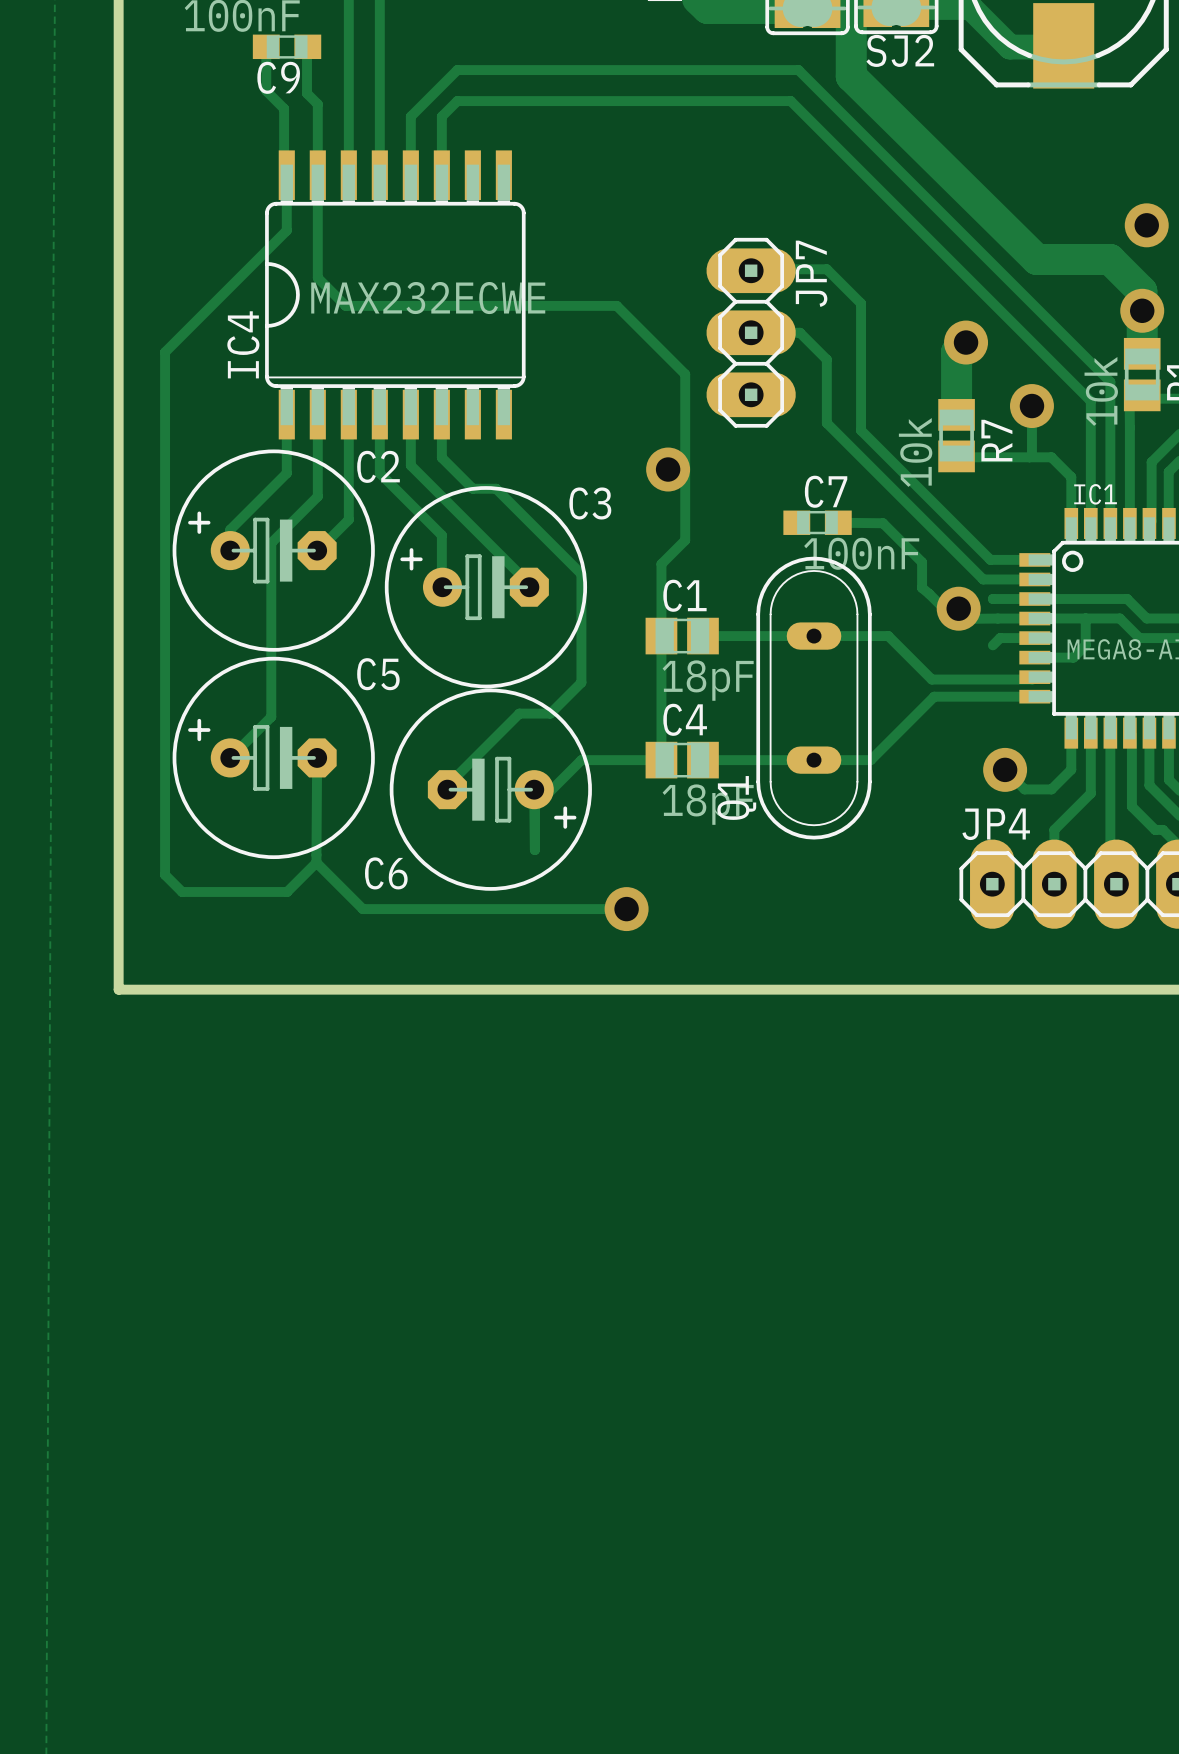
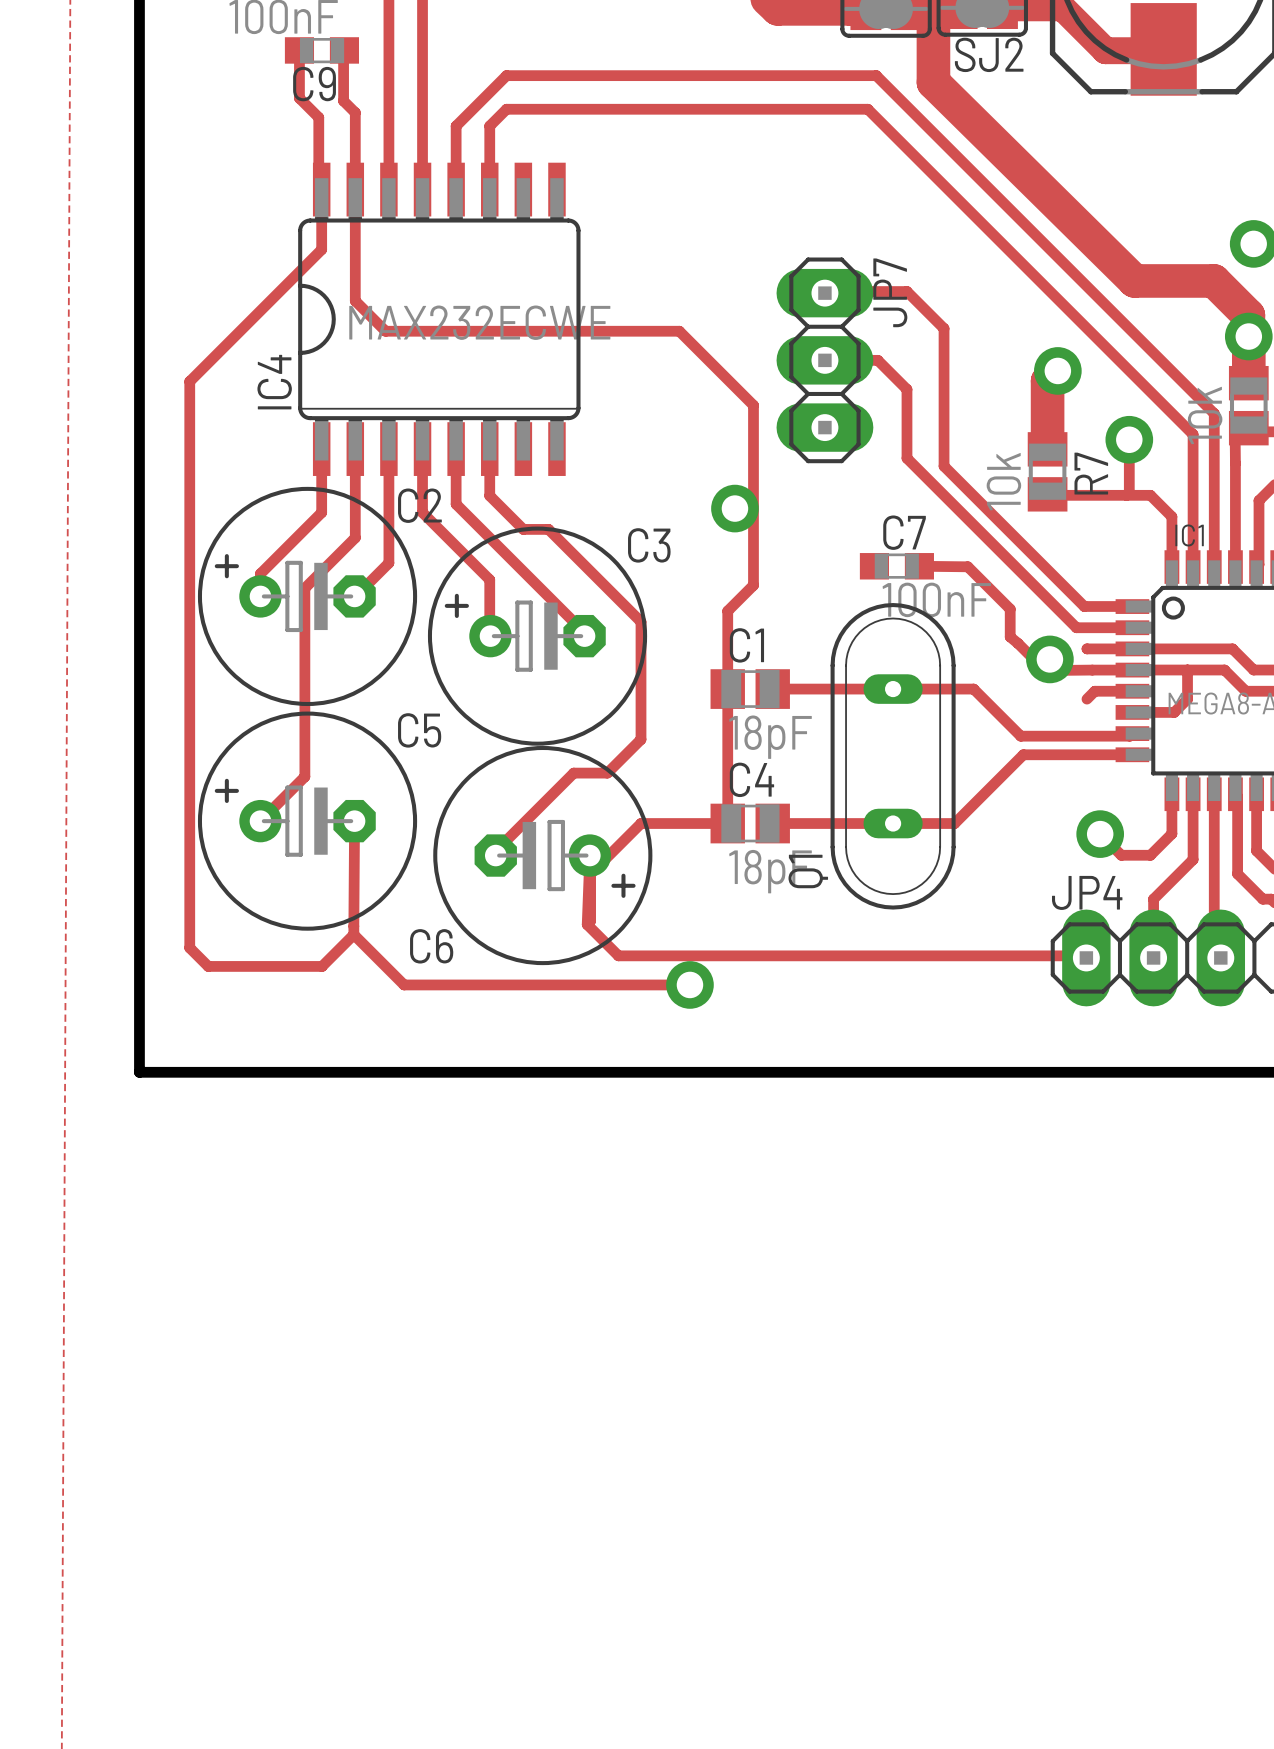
track: none -> (589, 855) (587, 924) (618, 955) (1084, 955) (1086, 957)

